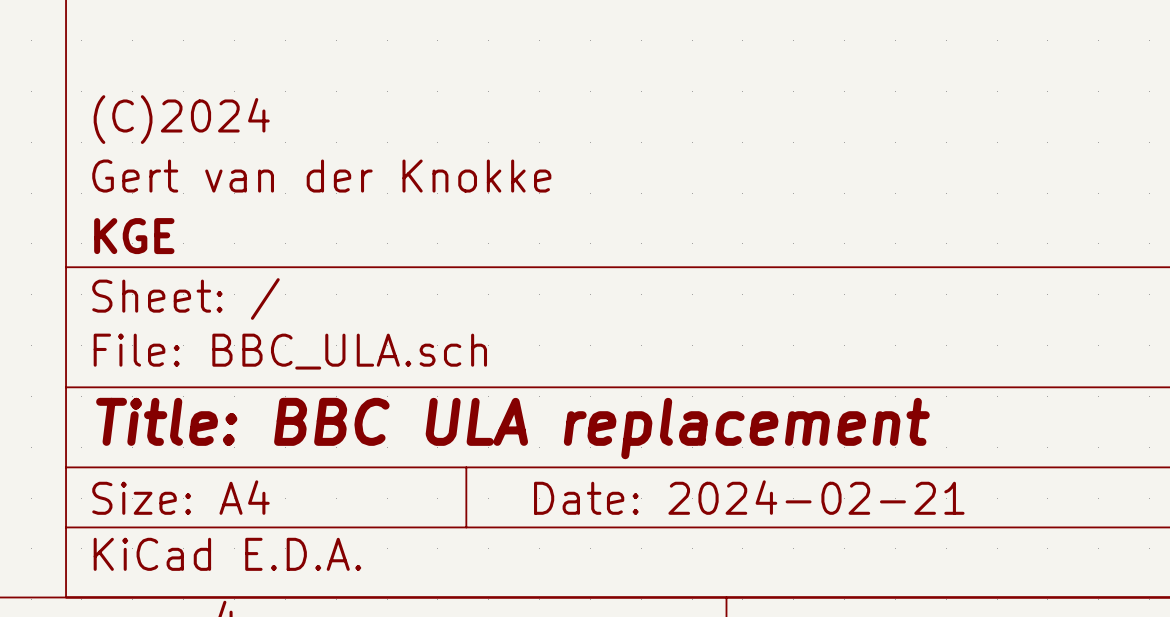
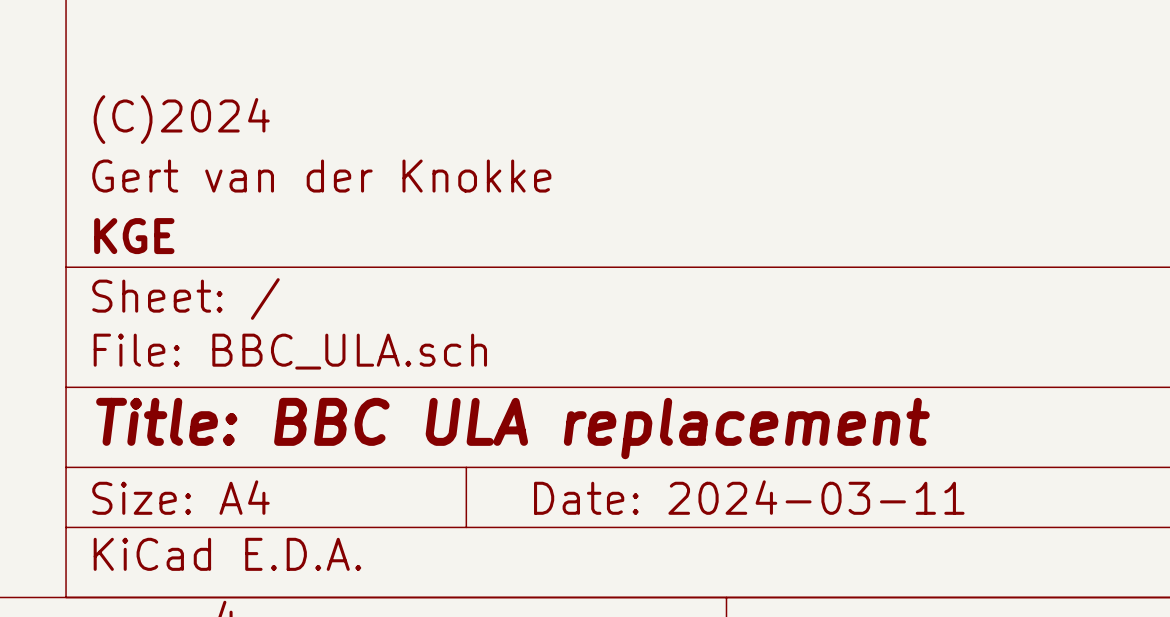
title block: Date: 2024-02-21 (749, 497) -> Date: 2024-03-11 (749, 497)

